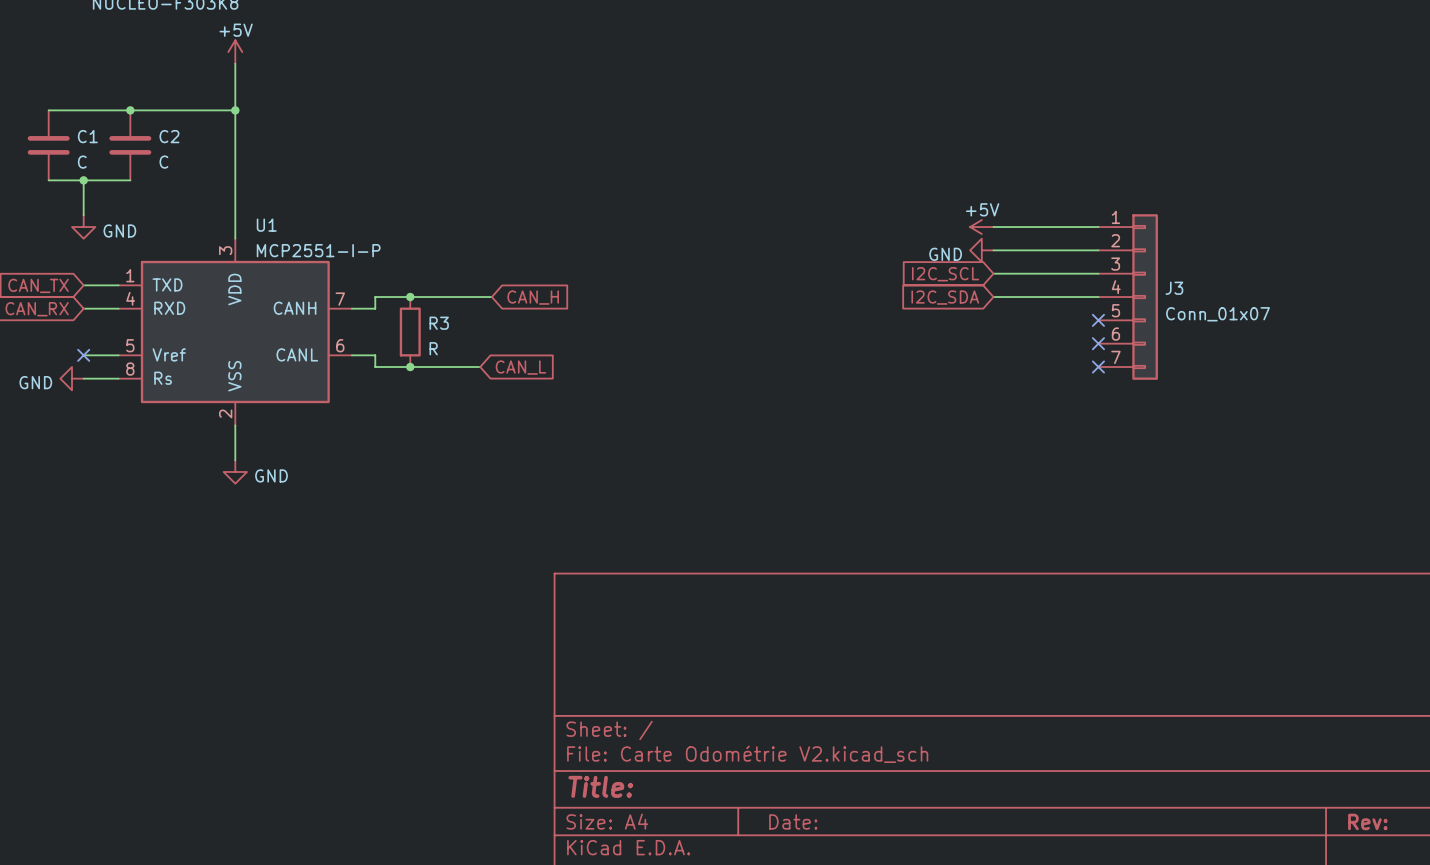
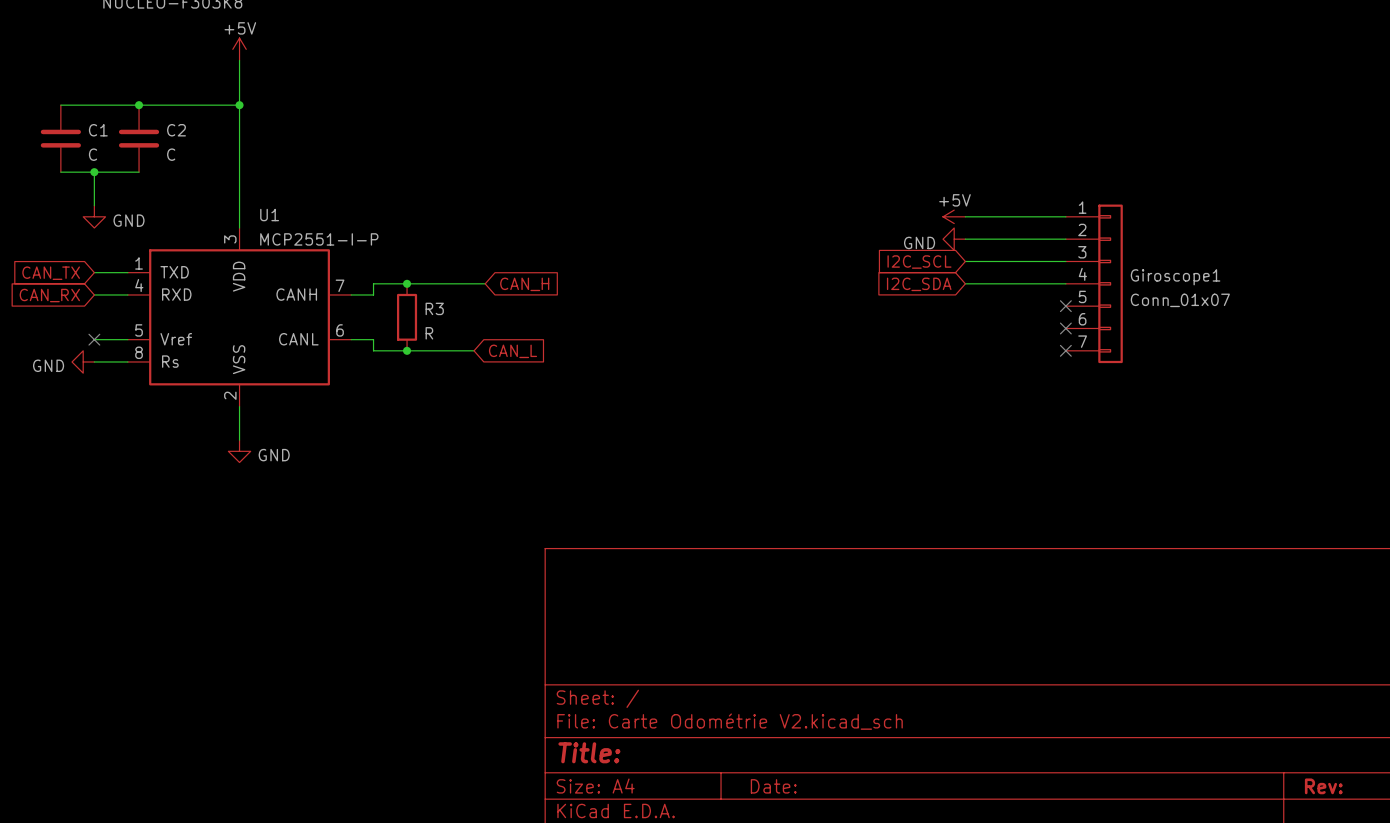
J3 name: J3 (1174, 288) -> Giroscope1 (1175, 277)

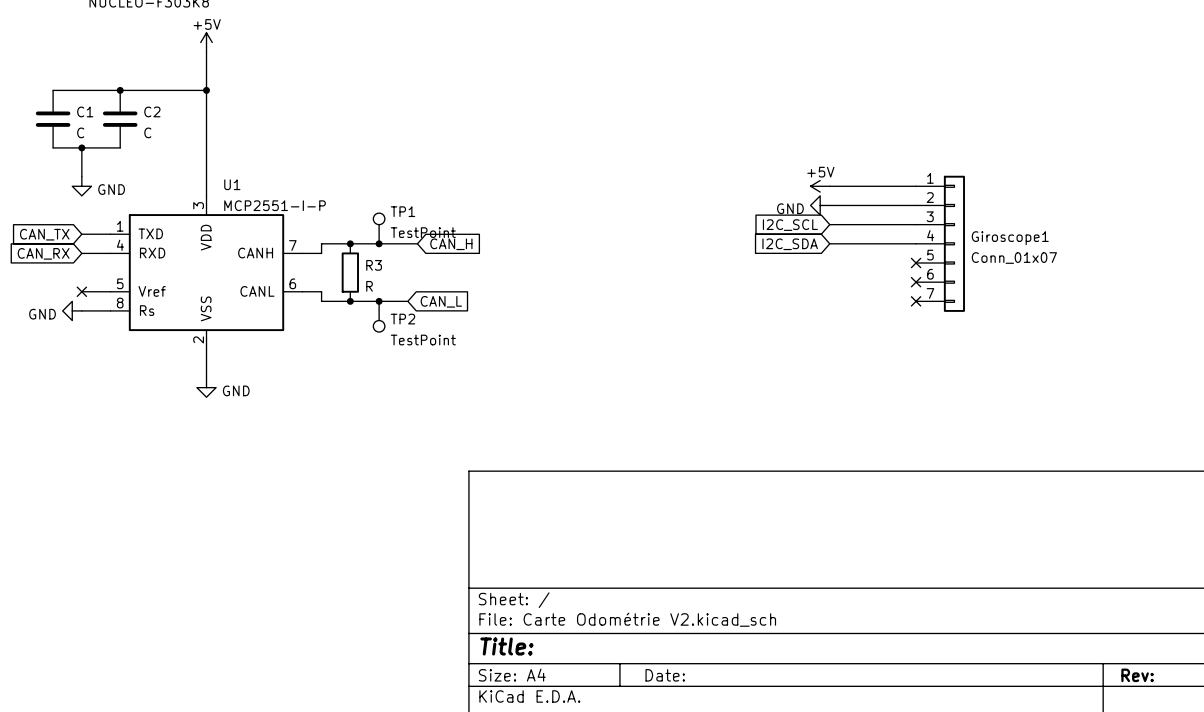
TP1: none -> TestPoint (379, 228)
junction: none -> (379, 243)
junction: none -> (379, 301)
TP2: none -> TestPoint (379, 316)

